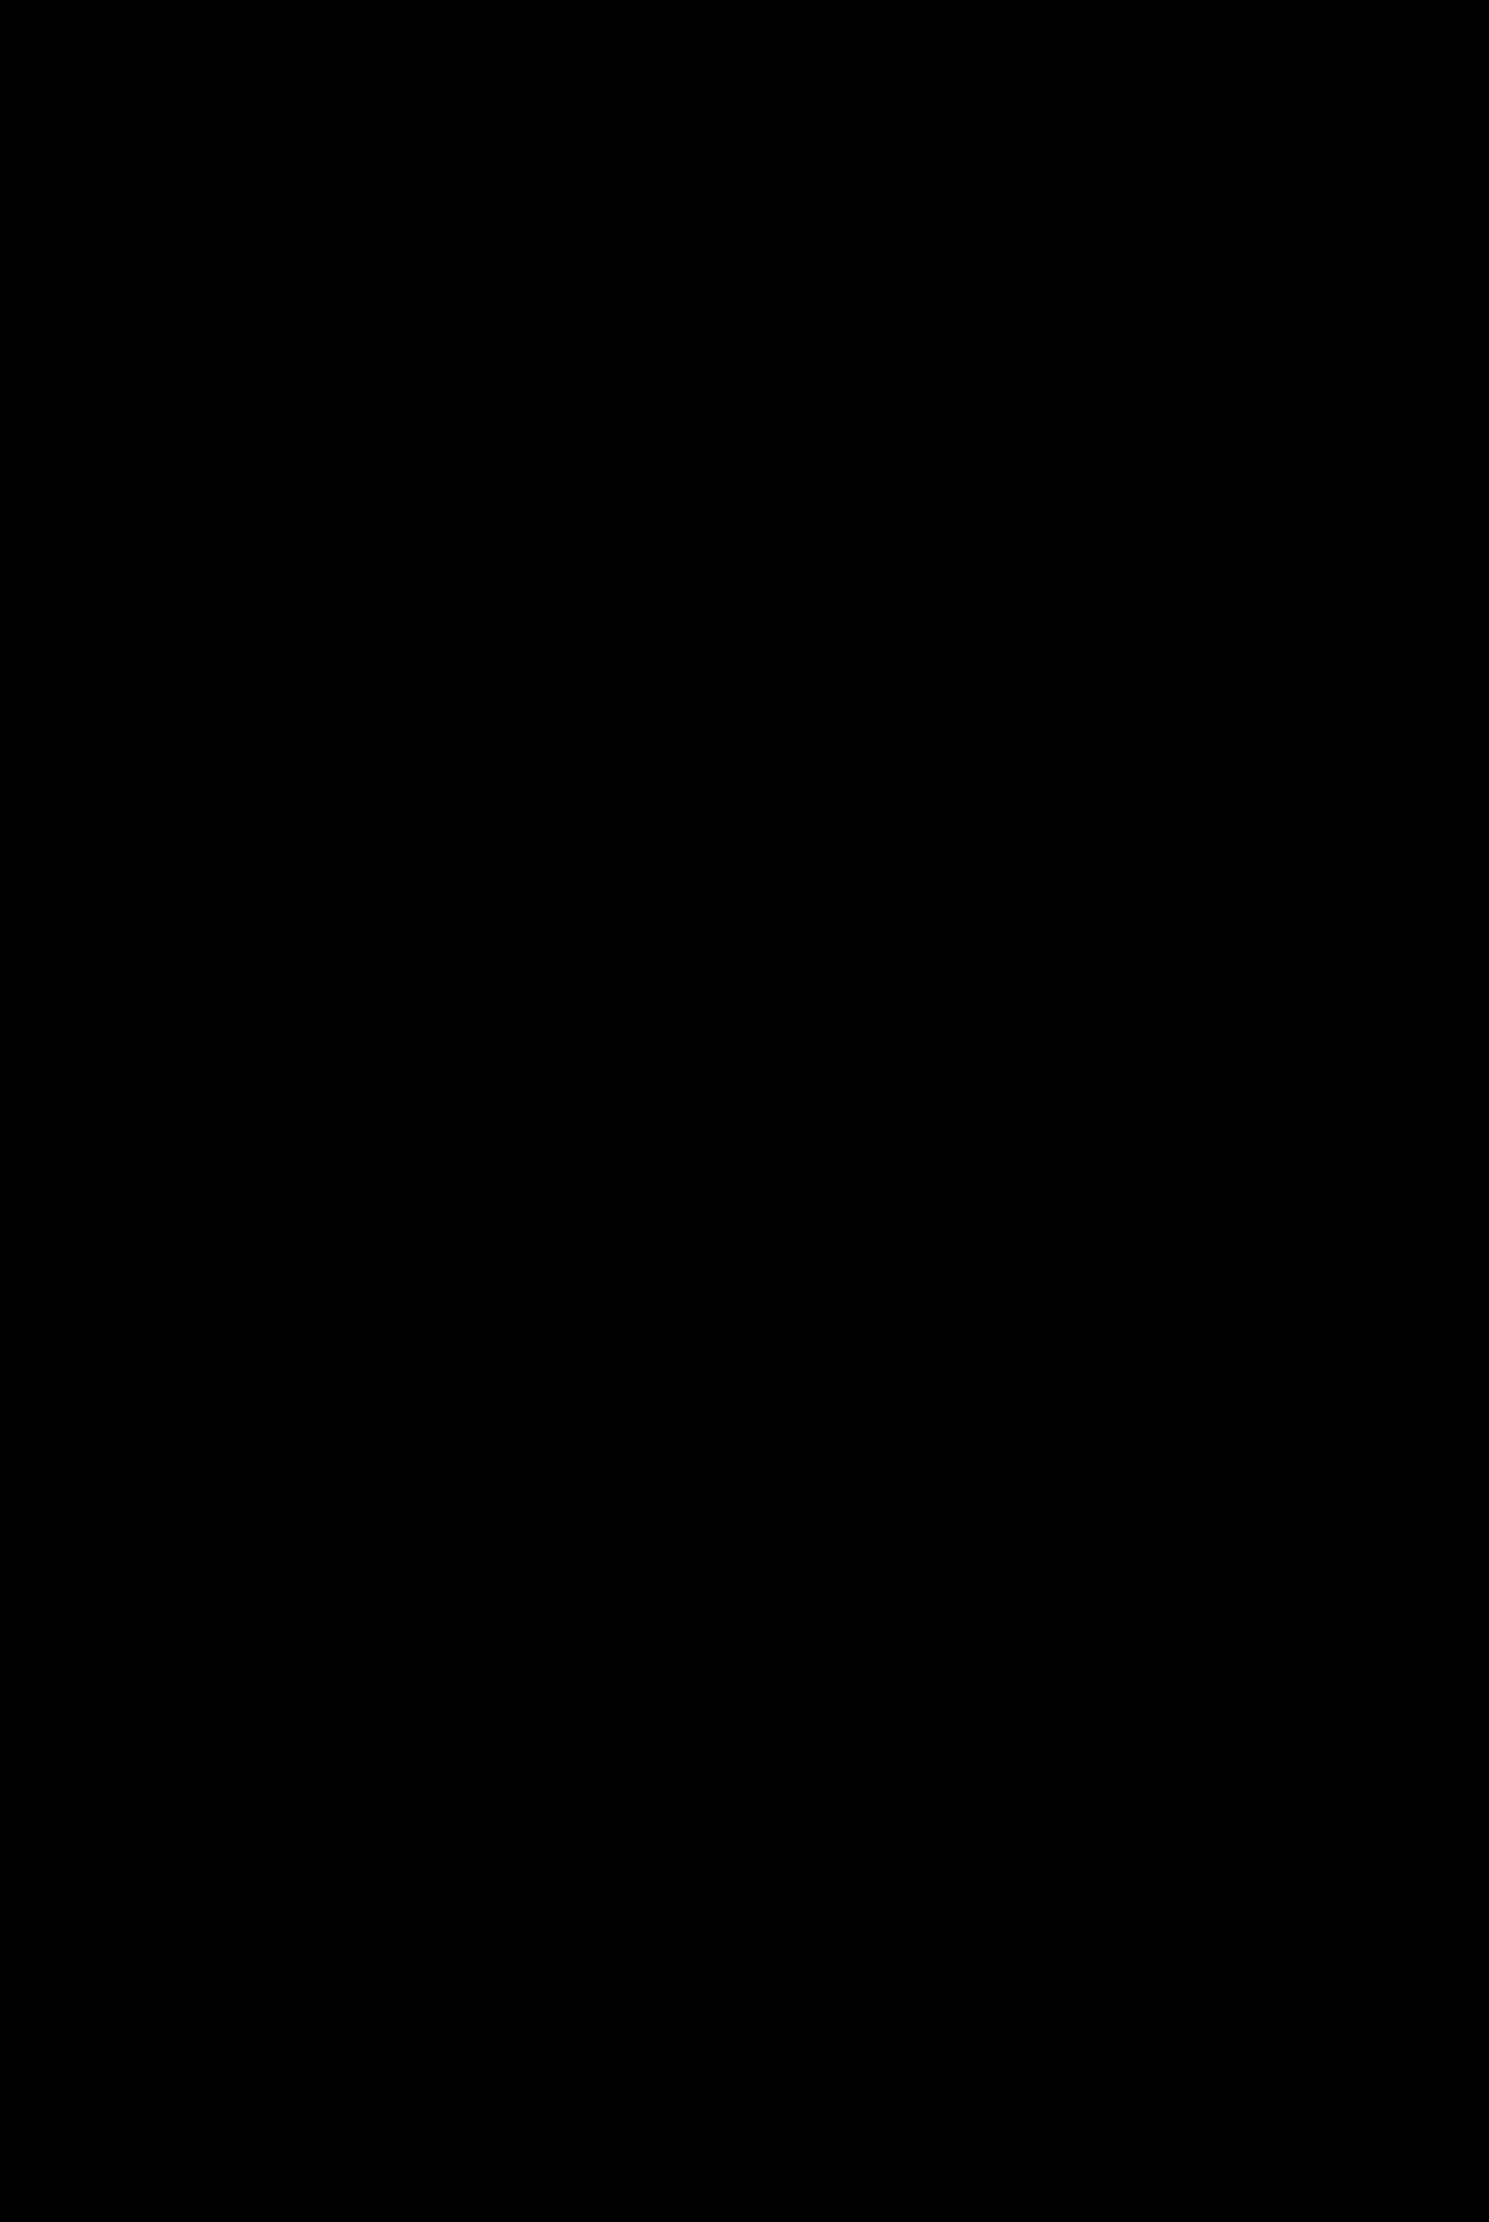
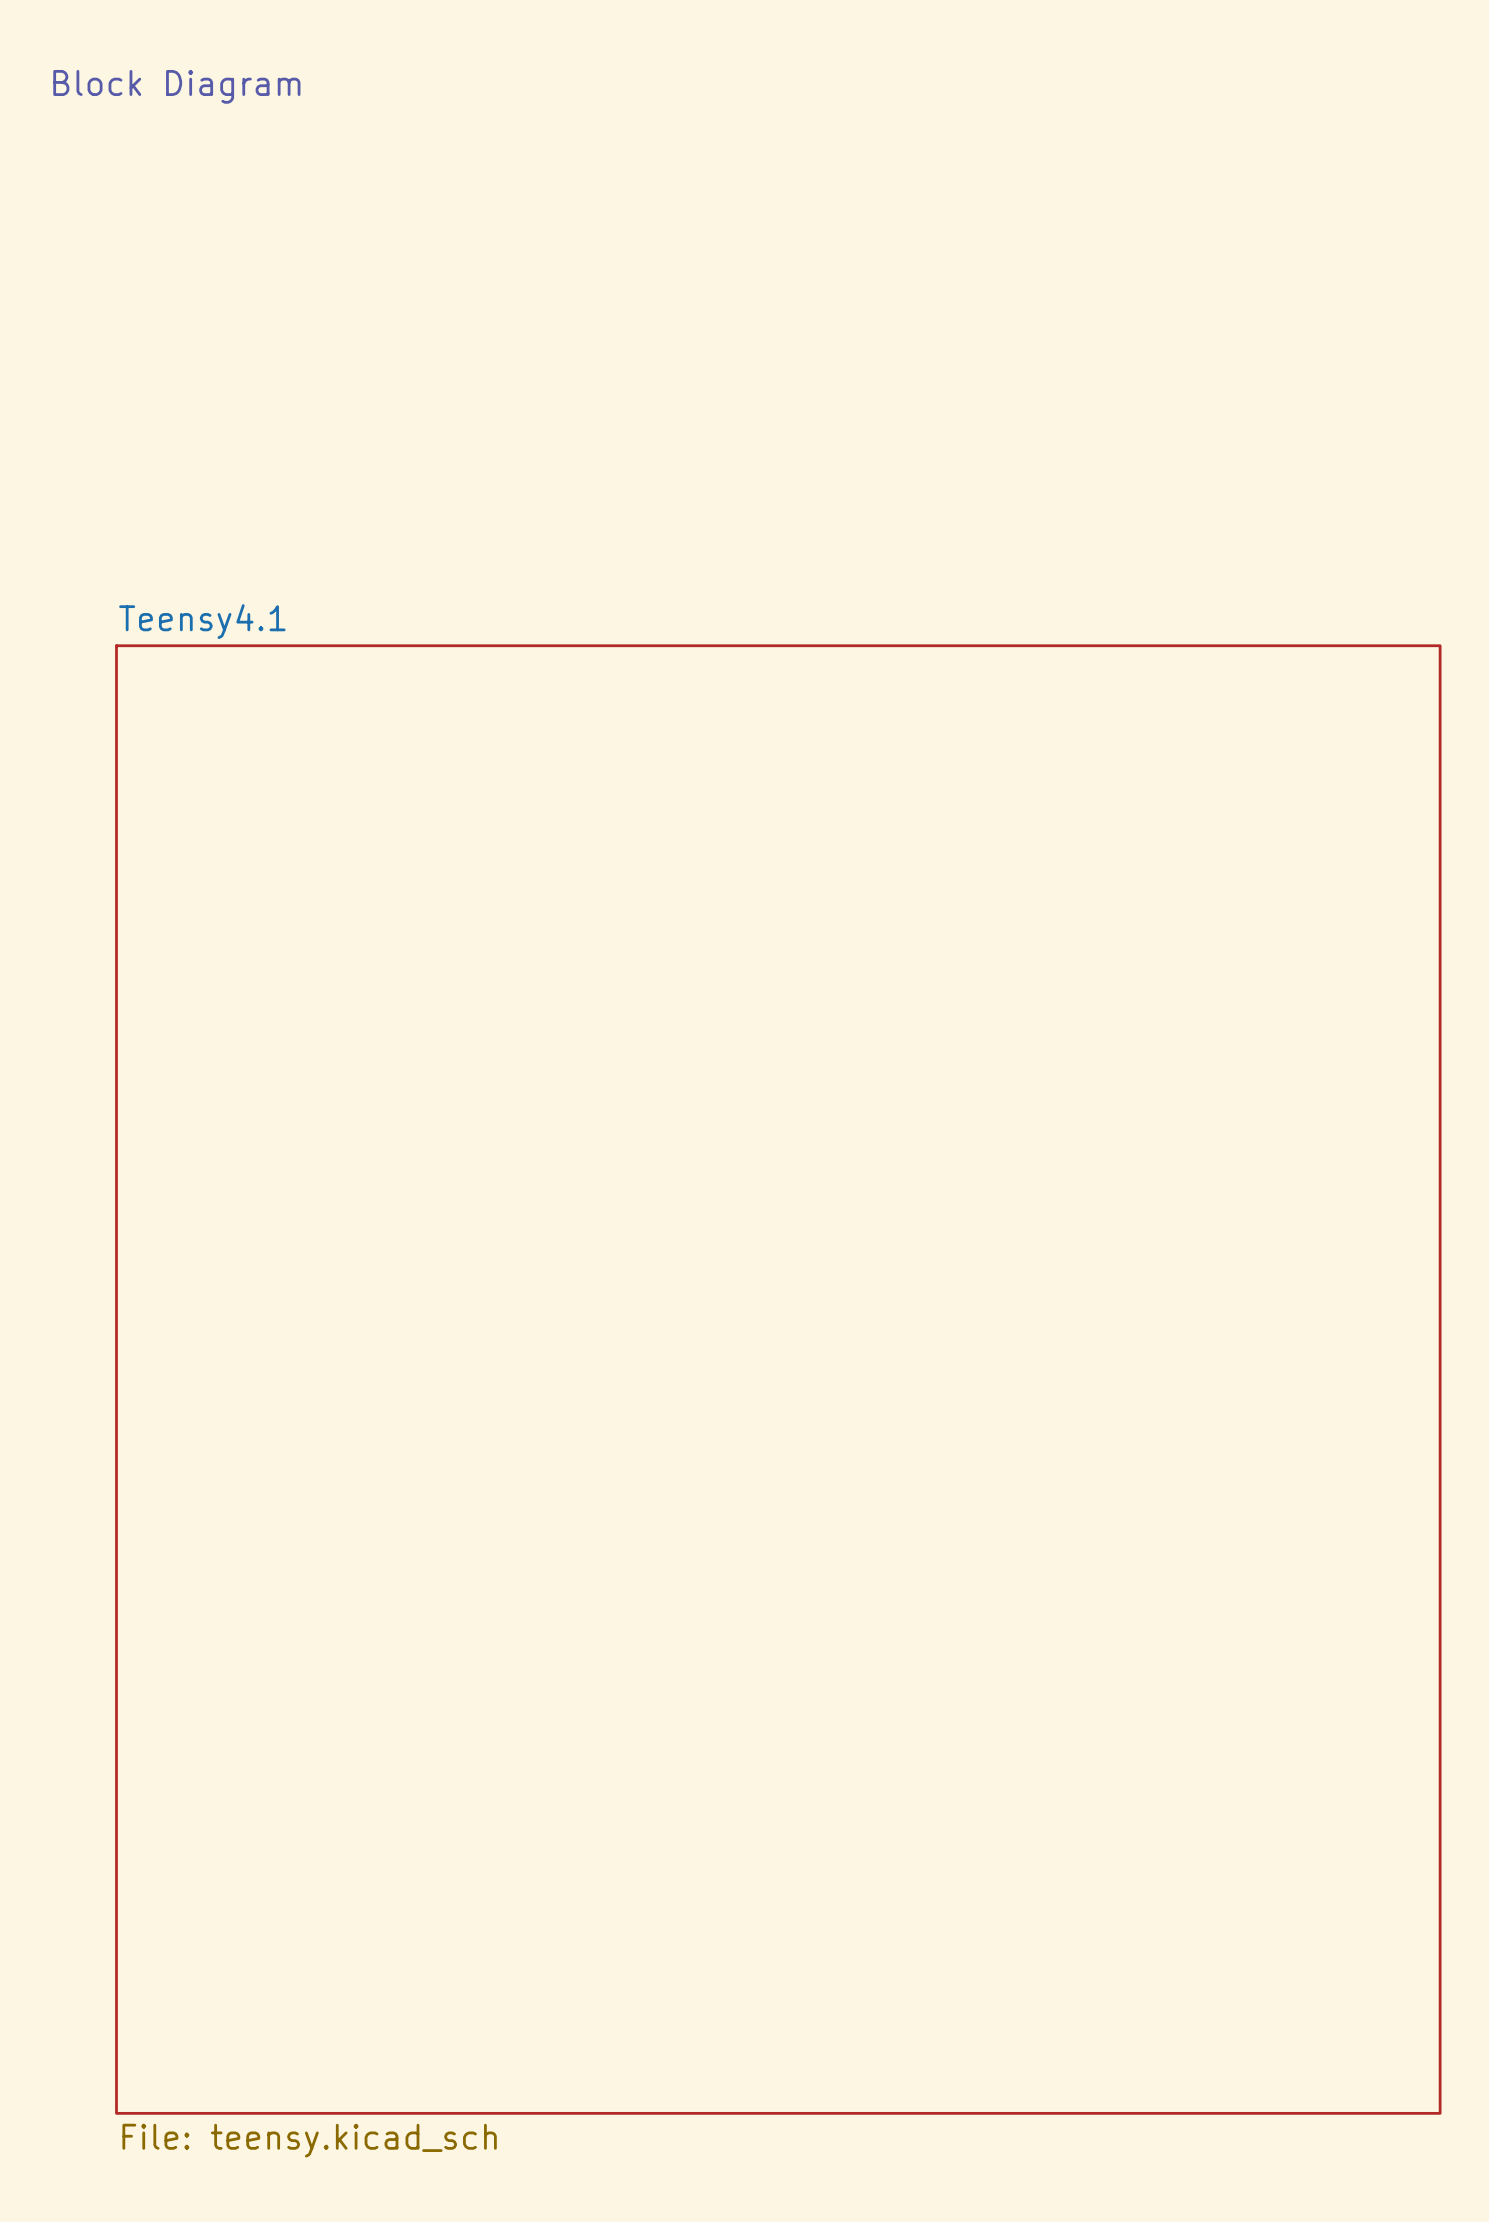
text: none -> Block Diagram (176, 86)
sheet Teensy4.1: none -> File: teensy.kicad_sch (778, 1379)

